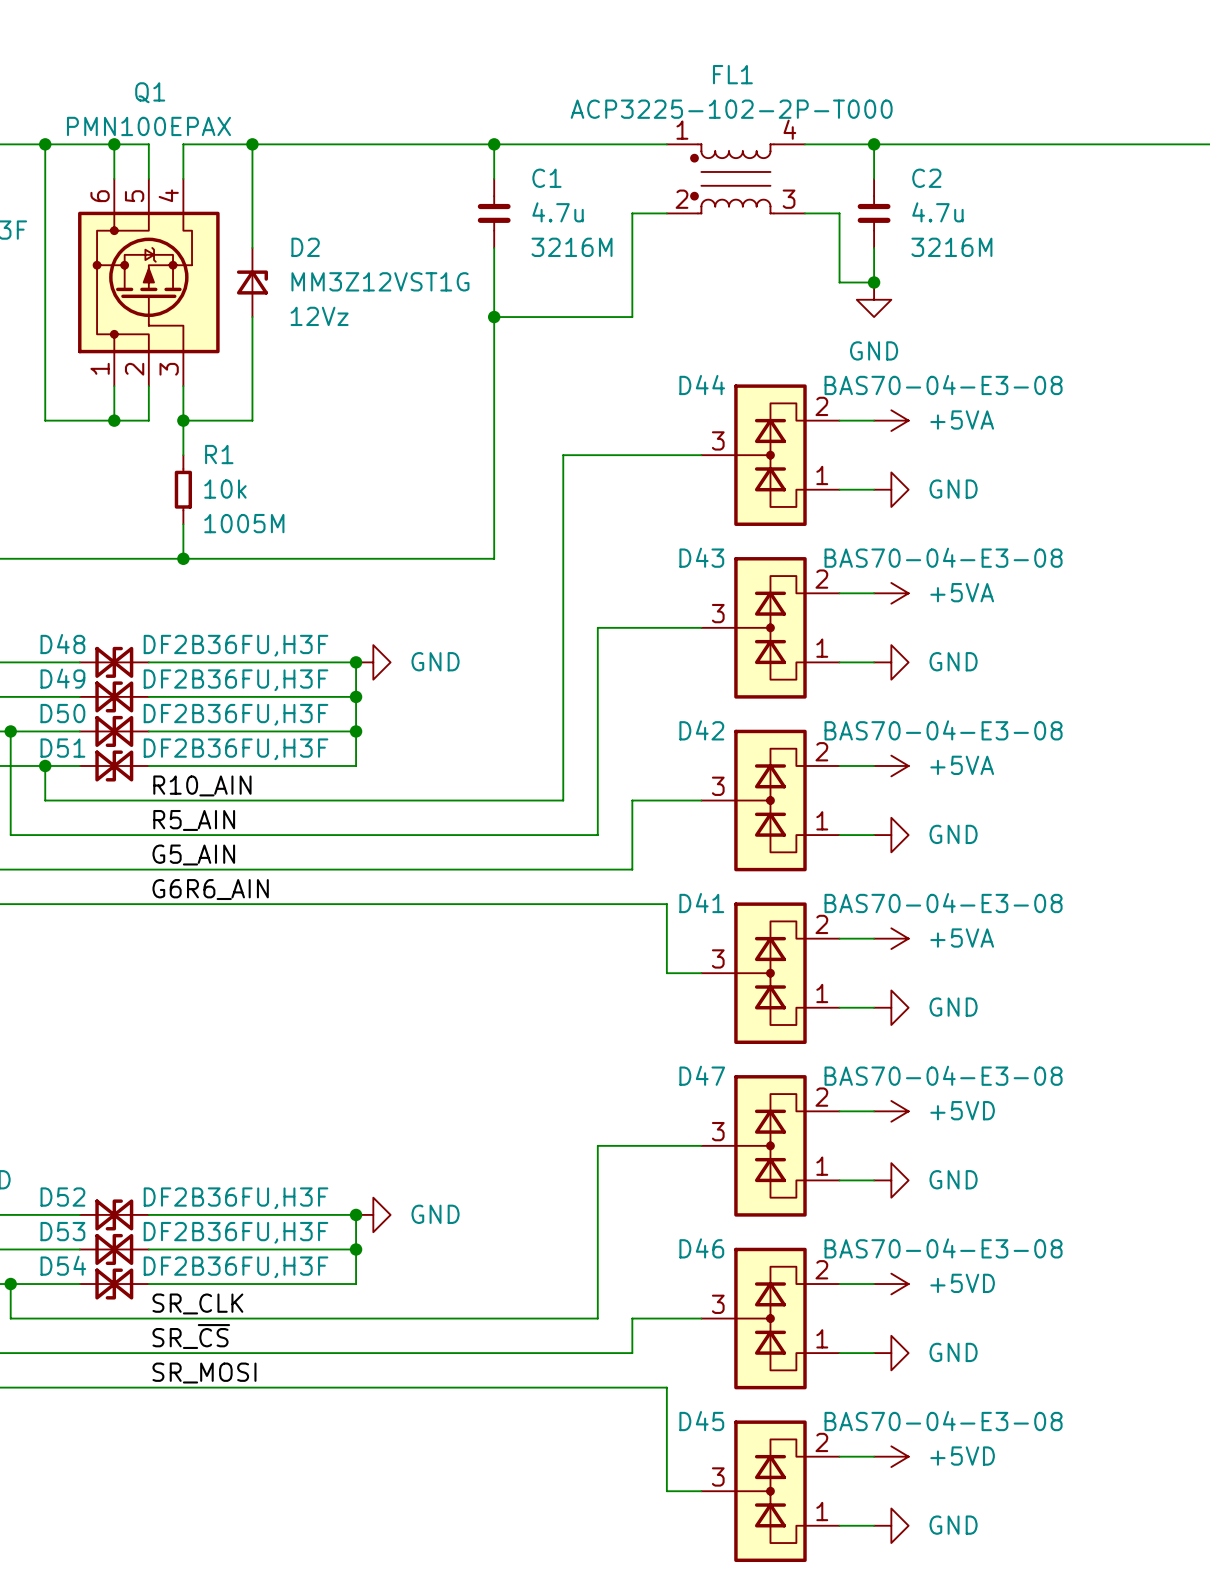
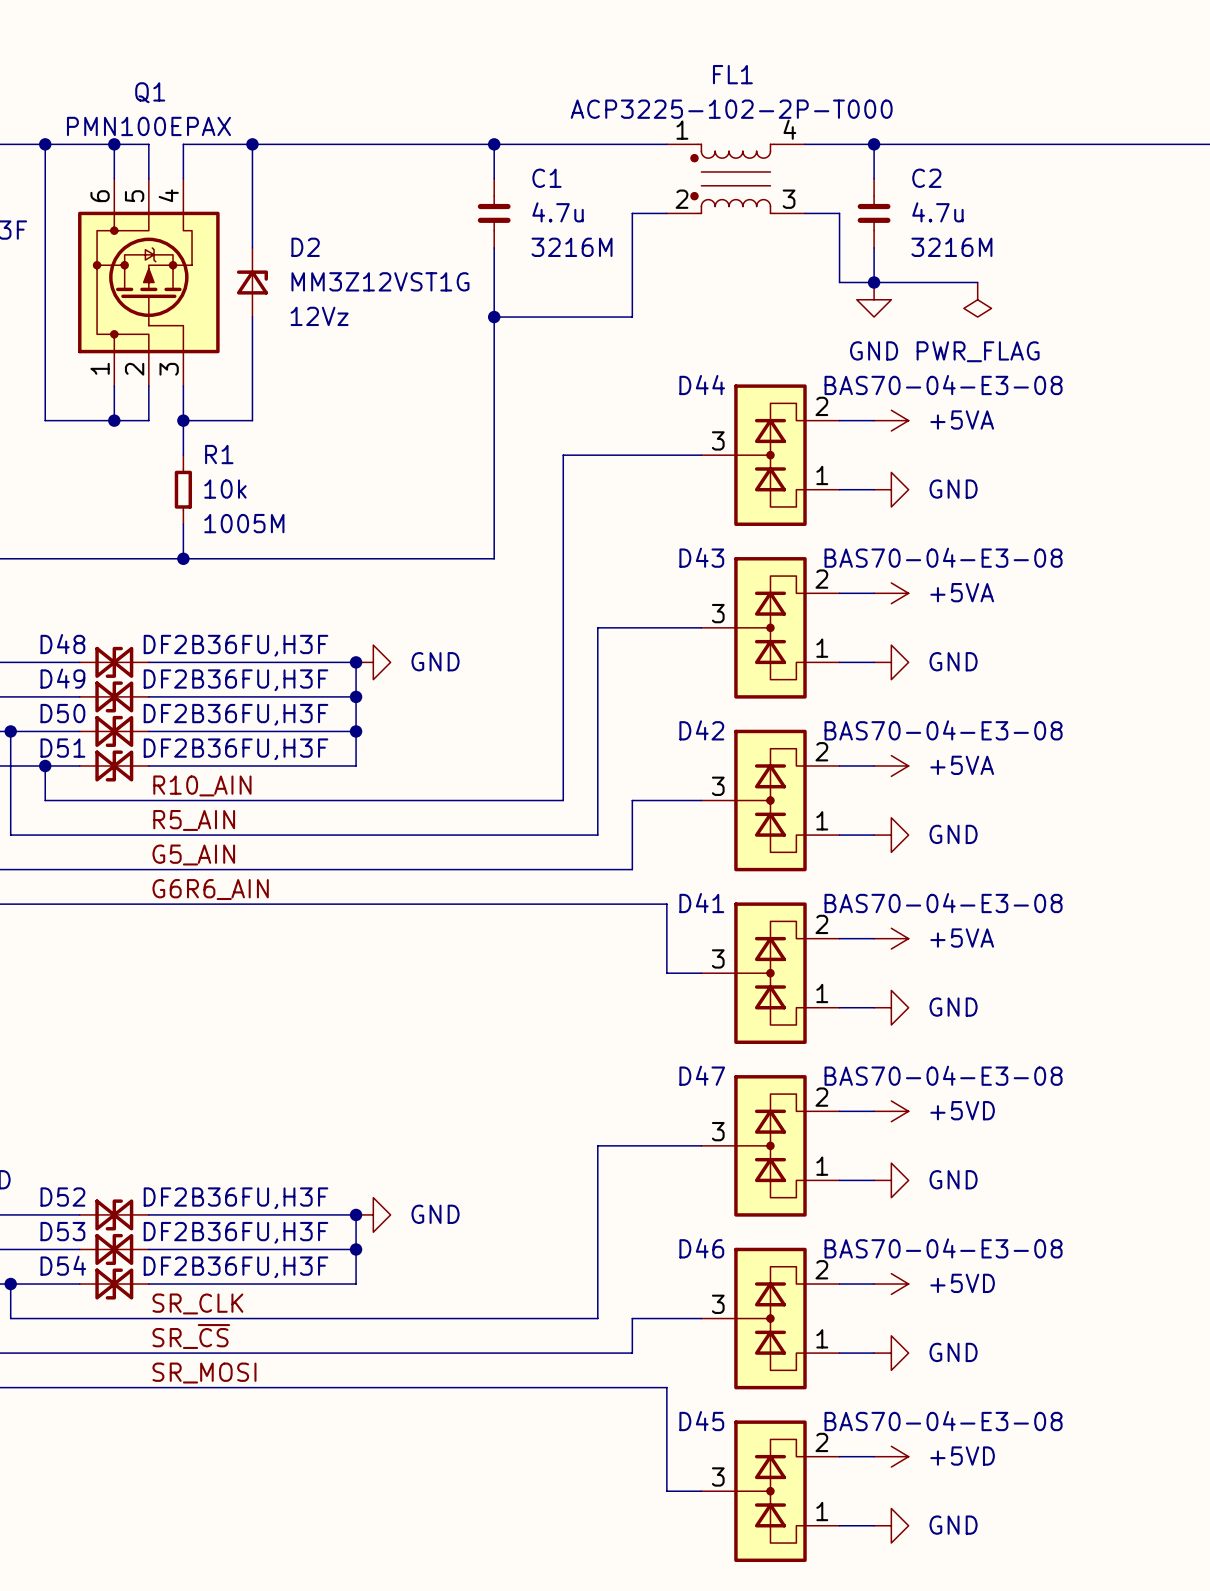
wire: none -> (874, 282) (977, 282)
power symbol: none -> PWR_FLAG (977, 299)

